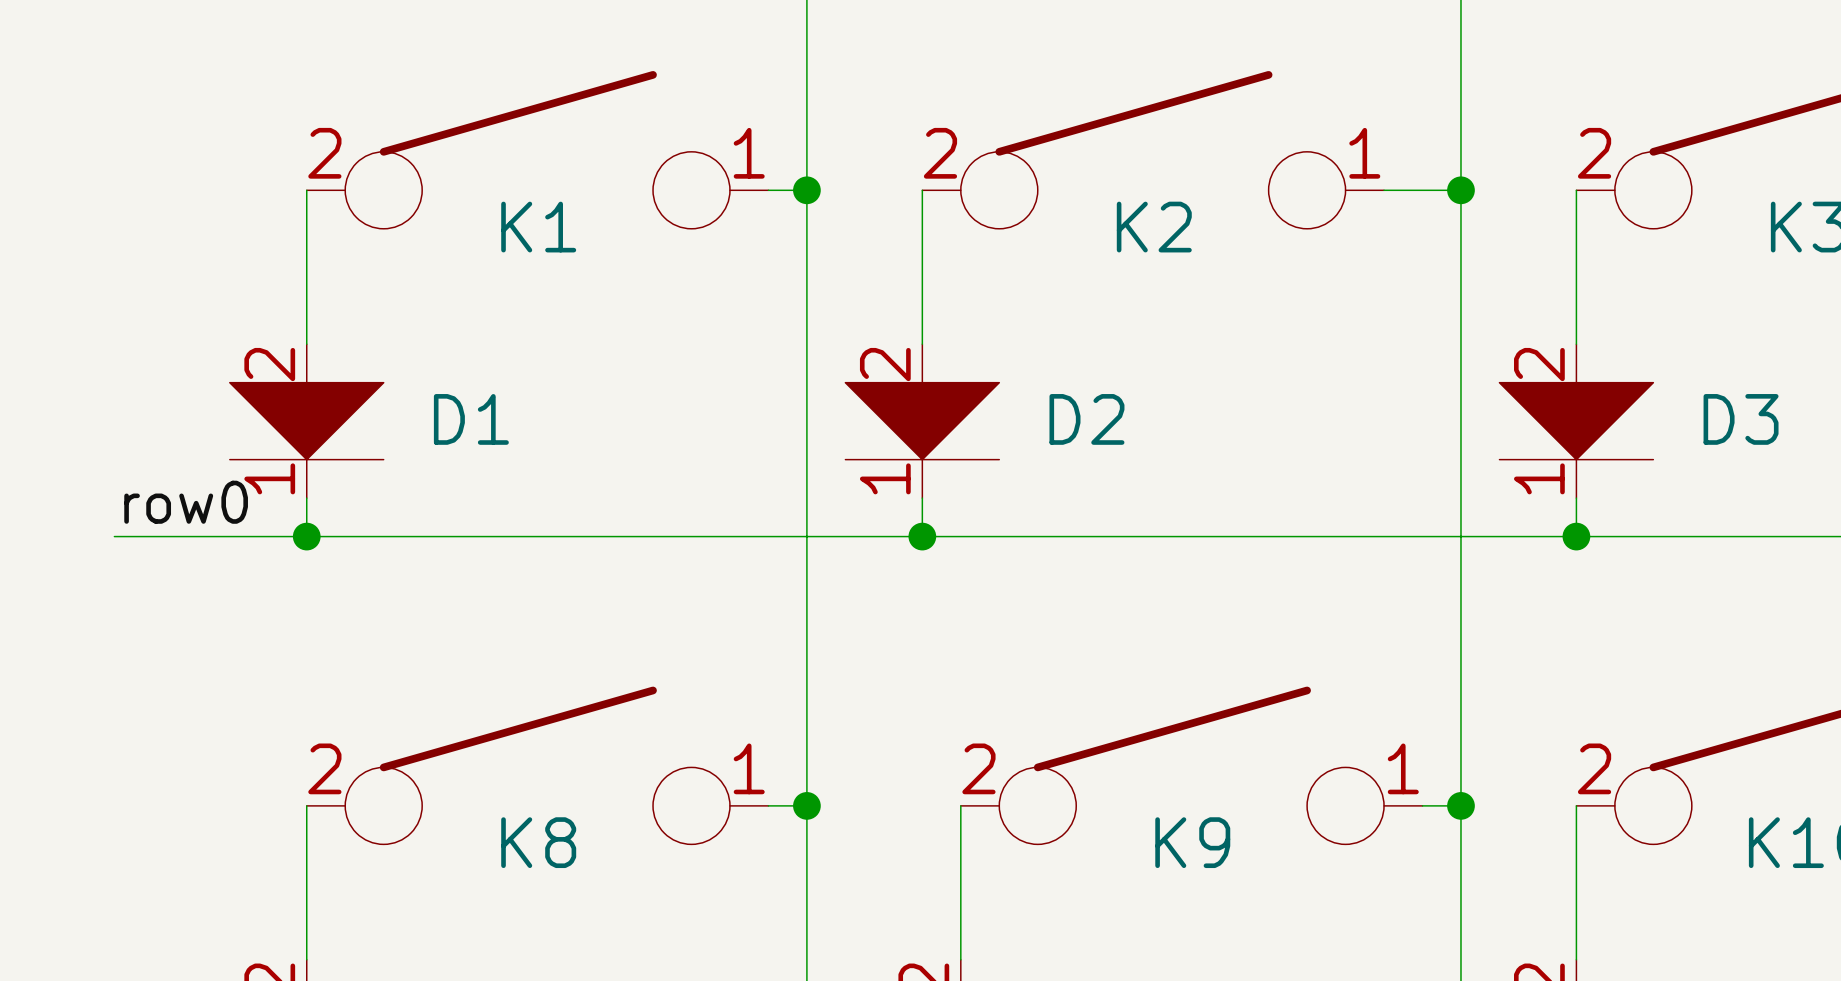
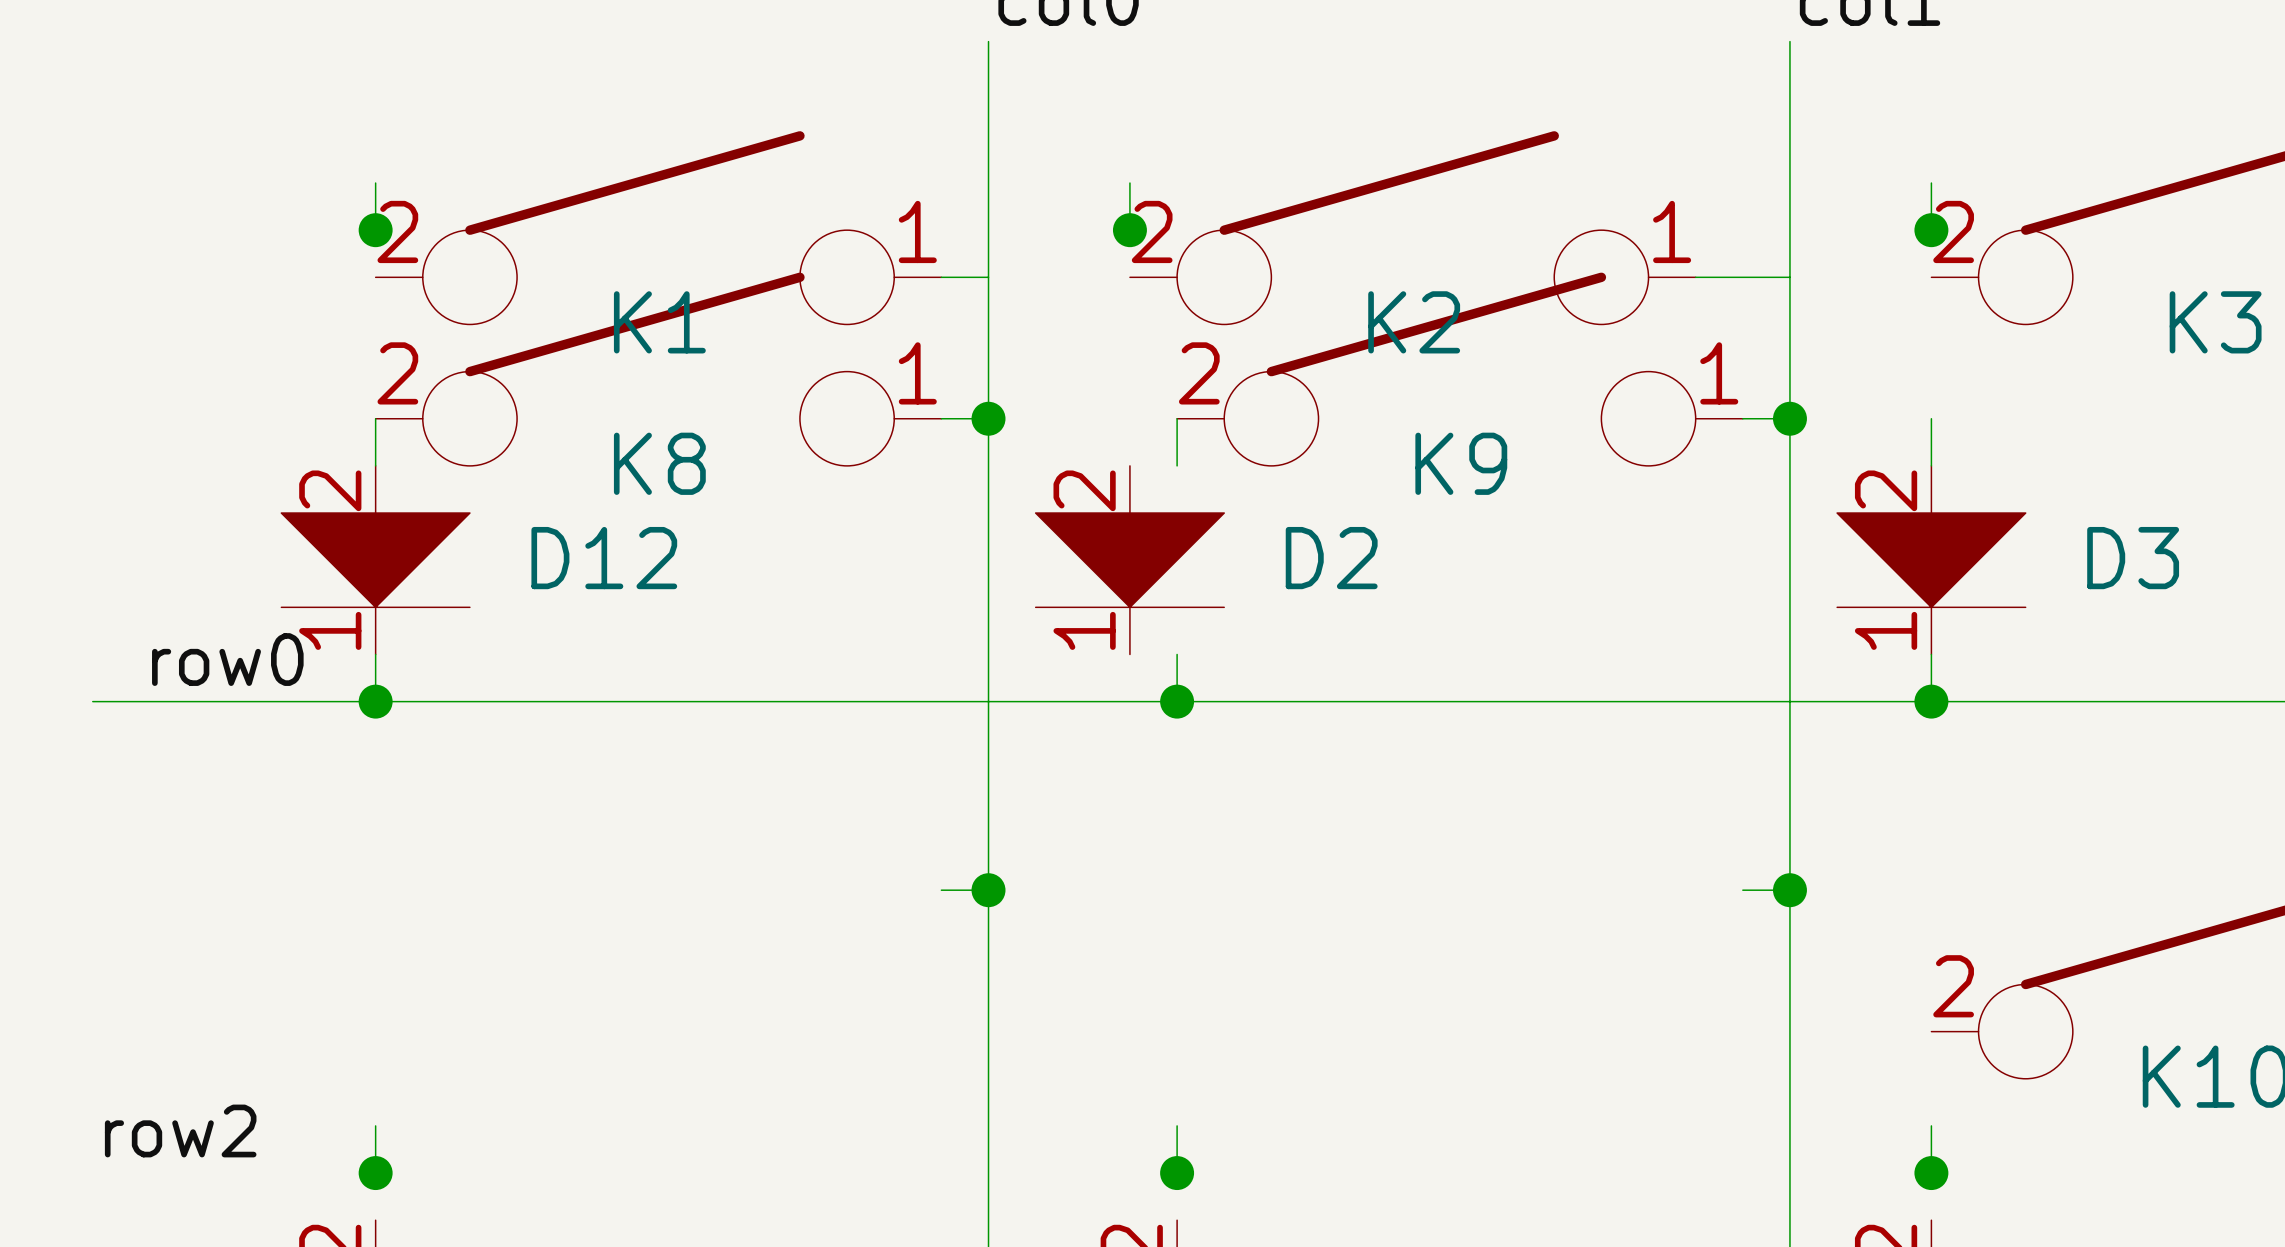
wire: none -> (375, 183) (375, 230)
wire: none -> (1931, 183) (1931, 230)
junction: none -> (375, 230)
junction: none -> (1129, 230)
junction: none -> (1931, 230)
wire: (306, 190) (306, 305) -> none
junction: (806, 190) -> none
wire: (922, 190) (922, 344) -> none
junction: (1460, 190) -> none
wire: (1576, 190) (1576, 305) -> none
junction: none -> (988, 418)
wire: none -> (1177, 418) (1177, 465)
junction: none -> (1789, 418)
D1 name: D1 (471, 419) -> D12 (604, 558)
wire: (922, 498) (922, 536) -> (1129, 183) (1129, 230)
wire: none -> (92, 701) (139, 701)
junction position: (922, 536) -> (1177, 701)
wire: none -> (941, 890) (988, 890)
junction: none -> (988, 890)
wire: none -> (1742, 890) (1789, 890)
junction: none -> (1789, 890)
K8 position: (537, 765) -> (658, 369)
K9 position: (1191, 765) -> (1459, 369)
wire: (306, 805) (306, 882) -> none
wire: (768, 805) (806, 805) -> (941, 418) (988, 418)
junction: (806, 805) -> none
wire: (960, 805) (960, 882) -> none
wire: (1422, 805) (1460, 805) -> (1742, 418) (1789, 418)
junction: (1460, 805) -> none
wire: (1576, 805) (1576, 882) -> none
label: none -> row2 (180, 1130)
wire: (306, 921) (306, 959) -> none
junction: none -> (375, 1173)
wire: (960, 921) (960, 959) -> (1177, 654) (1177, 701)
junction: none -> (1177, 1173)
wire: (1576, 921) (1576, 959) -> none
junction: none -> (1931, 1173)

